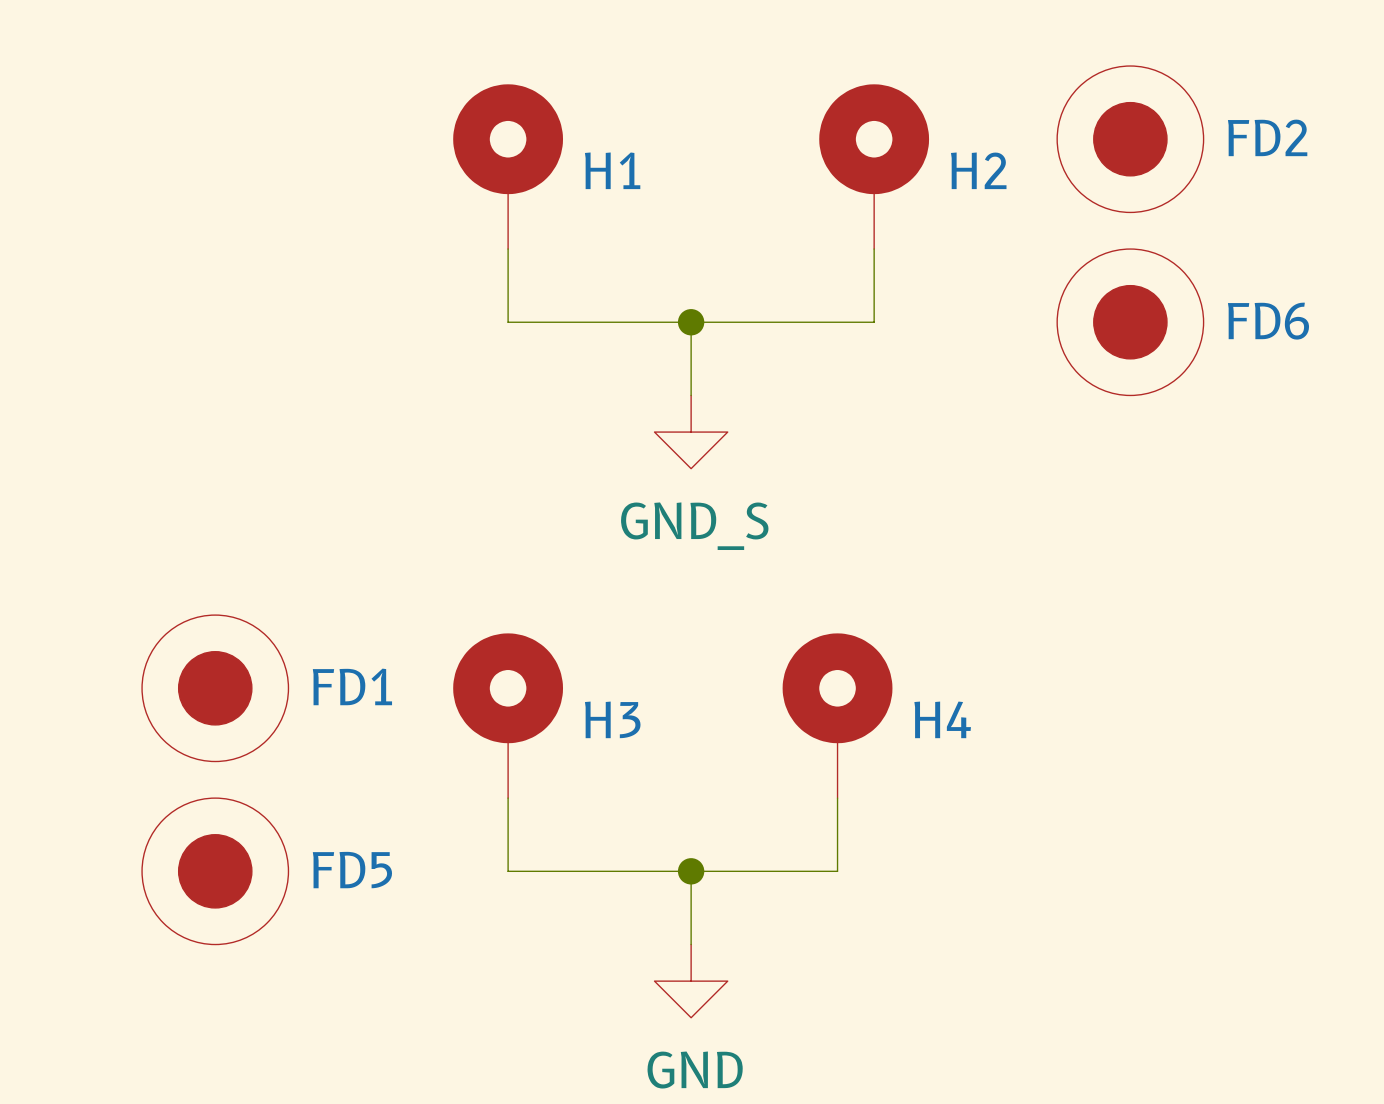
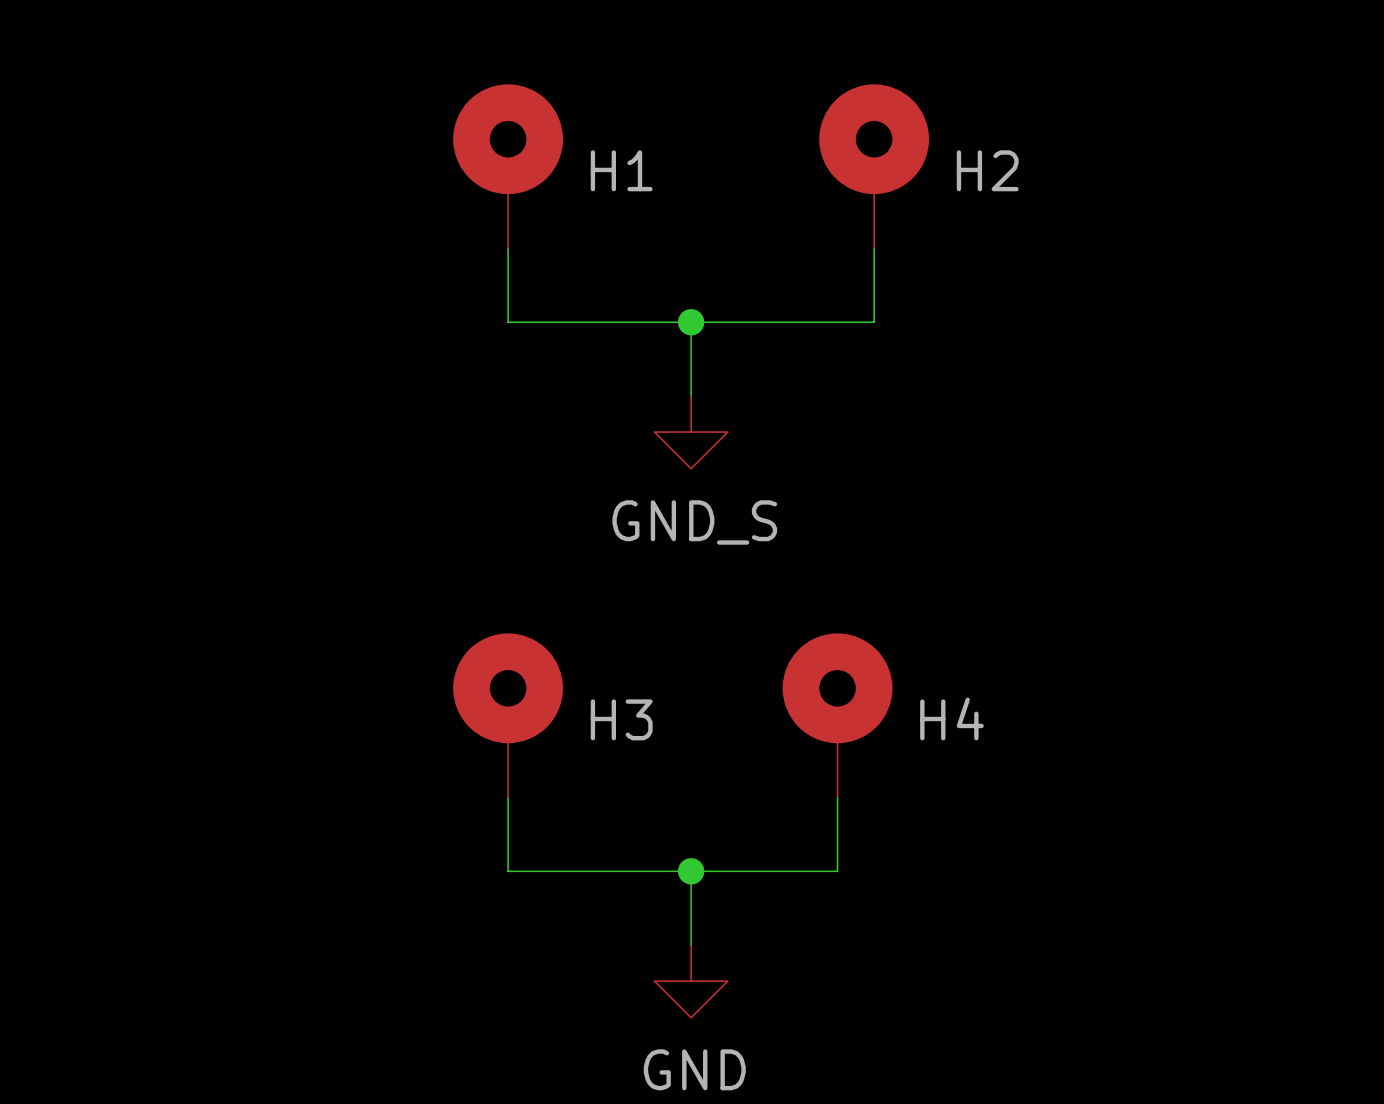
FD2: (1130, 139) -> none
FD6: (1130, 322) -> none
FD1: (215, 688) -> none
FD5: (215, 871) -> none

